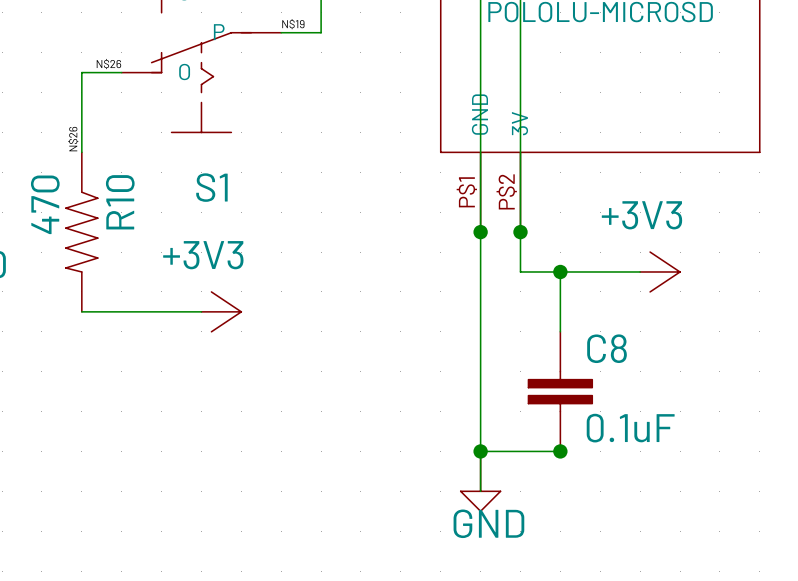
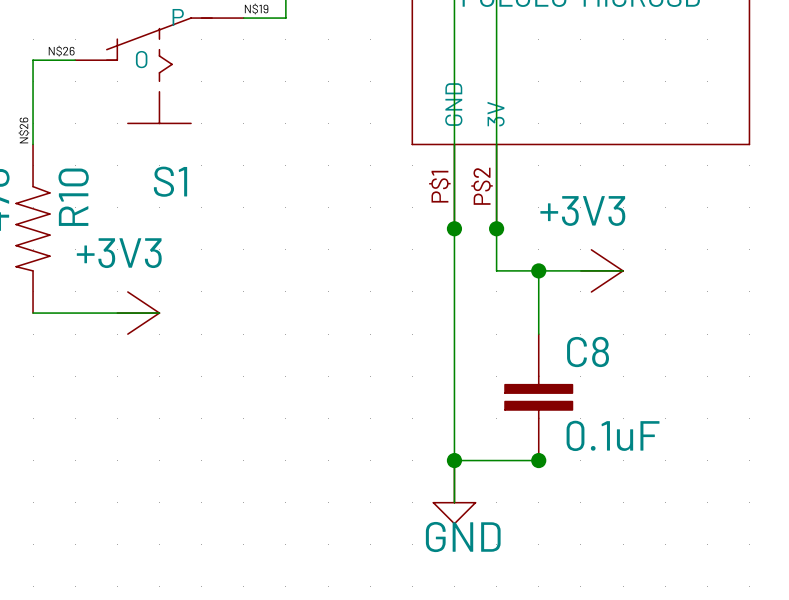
power symbol position: +3V3 (660, 271) -> +3V3 (601, 270)
power symbol position: +3V3 (221, 311) -> +3V3 (138, 313)

